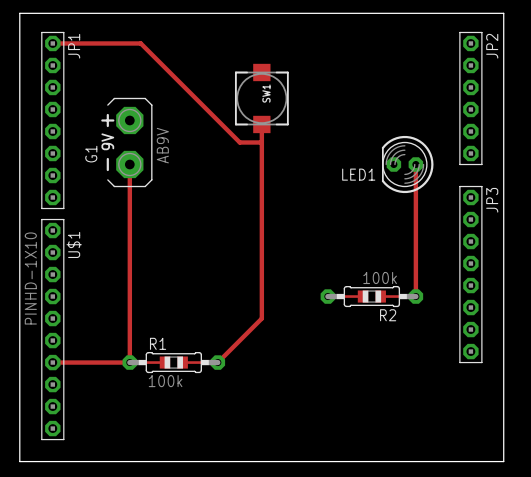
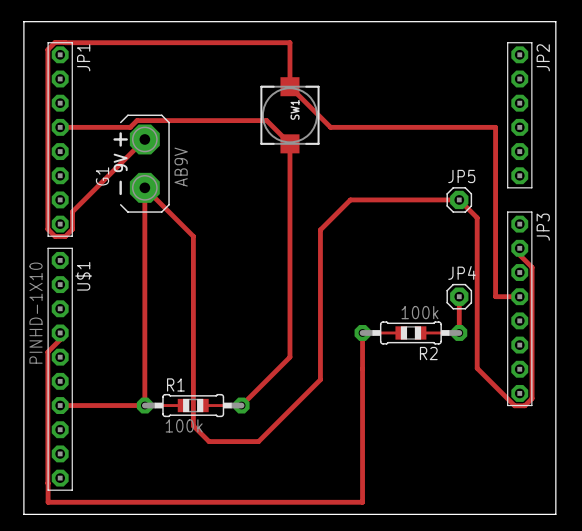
track: (52, 43) (140, 43) (239, 142) (261, 142) -> none
track: none -> (60, 127) (130, 127) (137, 120) (266, 120) (289, 143)
track: none -> (144, 139) (72, 211) (72, 229) (65, 236) (55, 236) (47, 229) (47, 49) (55, 42) (289, 42) (289, 86) (330, 127) (495, 127) (495, 296) (519, 296)
track: none -> (144, 187) (193, 236) (193, 425) (209, 441) (258, 441) (320, 379) (320, 229) (350, 199) (459, 199) (477, 217) (477, 368) (514, 405) (524, 405) (532, 398) (532, 267) (519, 255) (519, 248)
LED1: (407, 164) -> none
track: (415, 164) (415, 263) -> none
JP5: none -> (459, 199)
JP4: none -> (459, 296)
track: none -> (60, 332) (60, 339) (47, 352) (48, 502) (362, 502) (362, 332)

